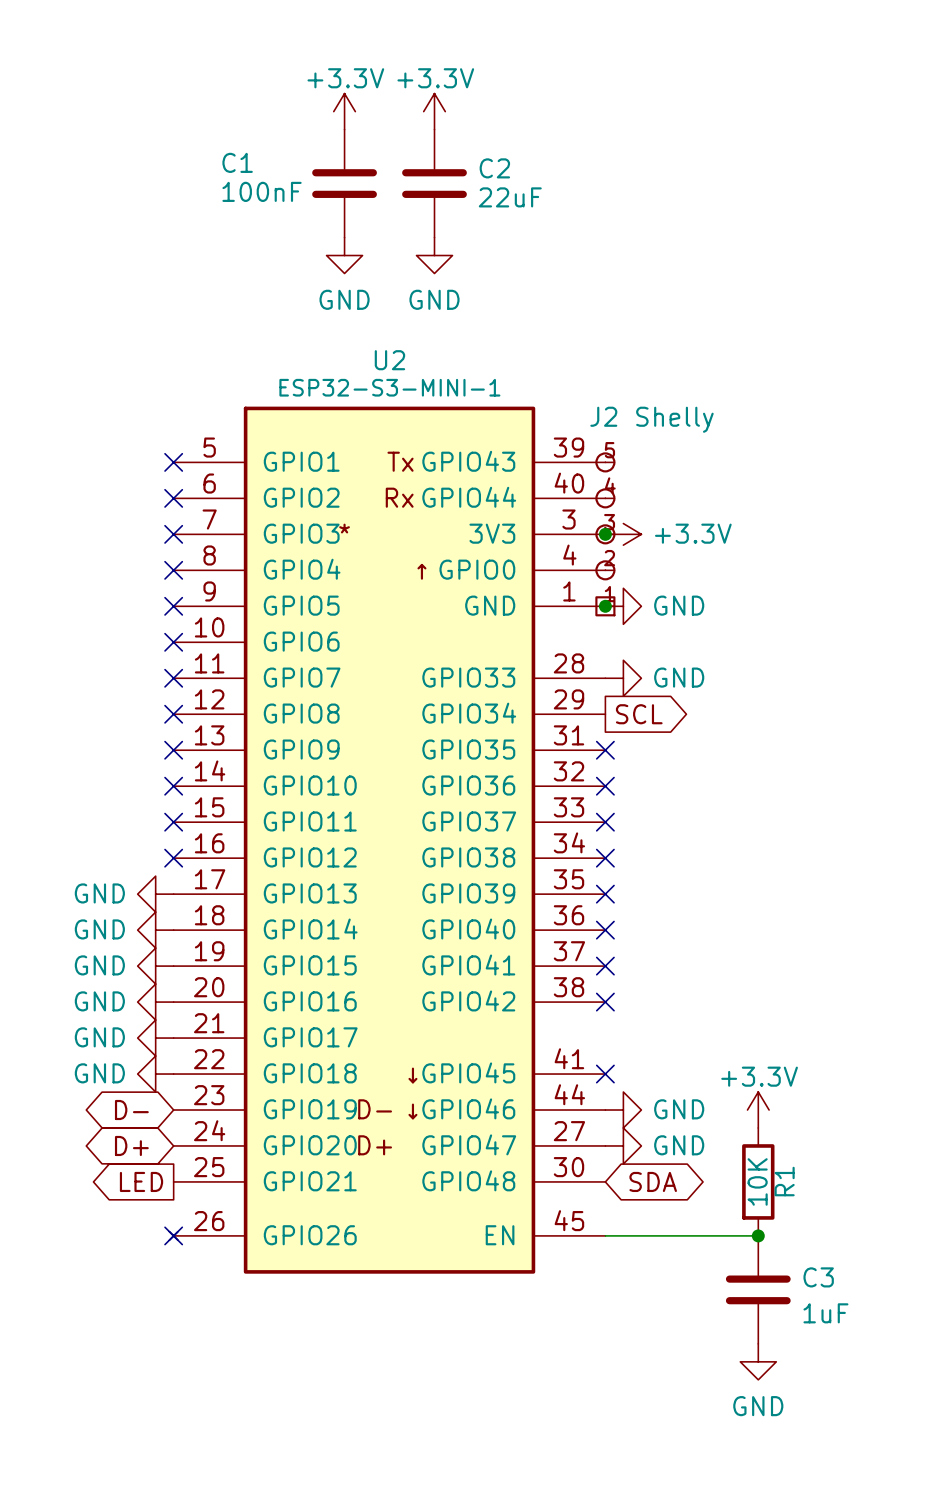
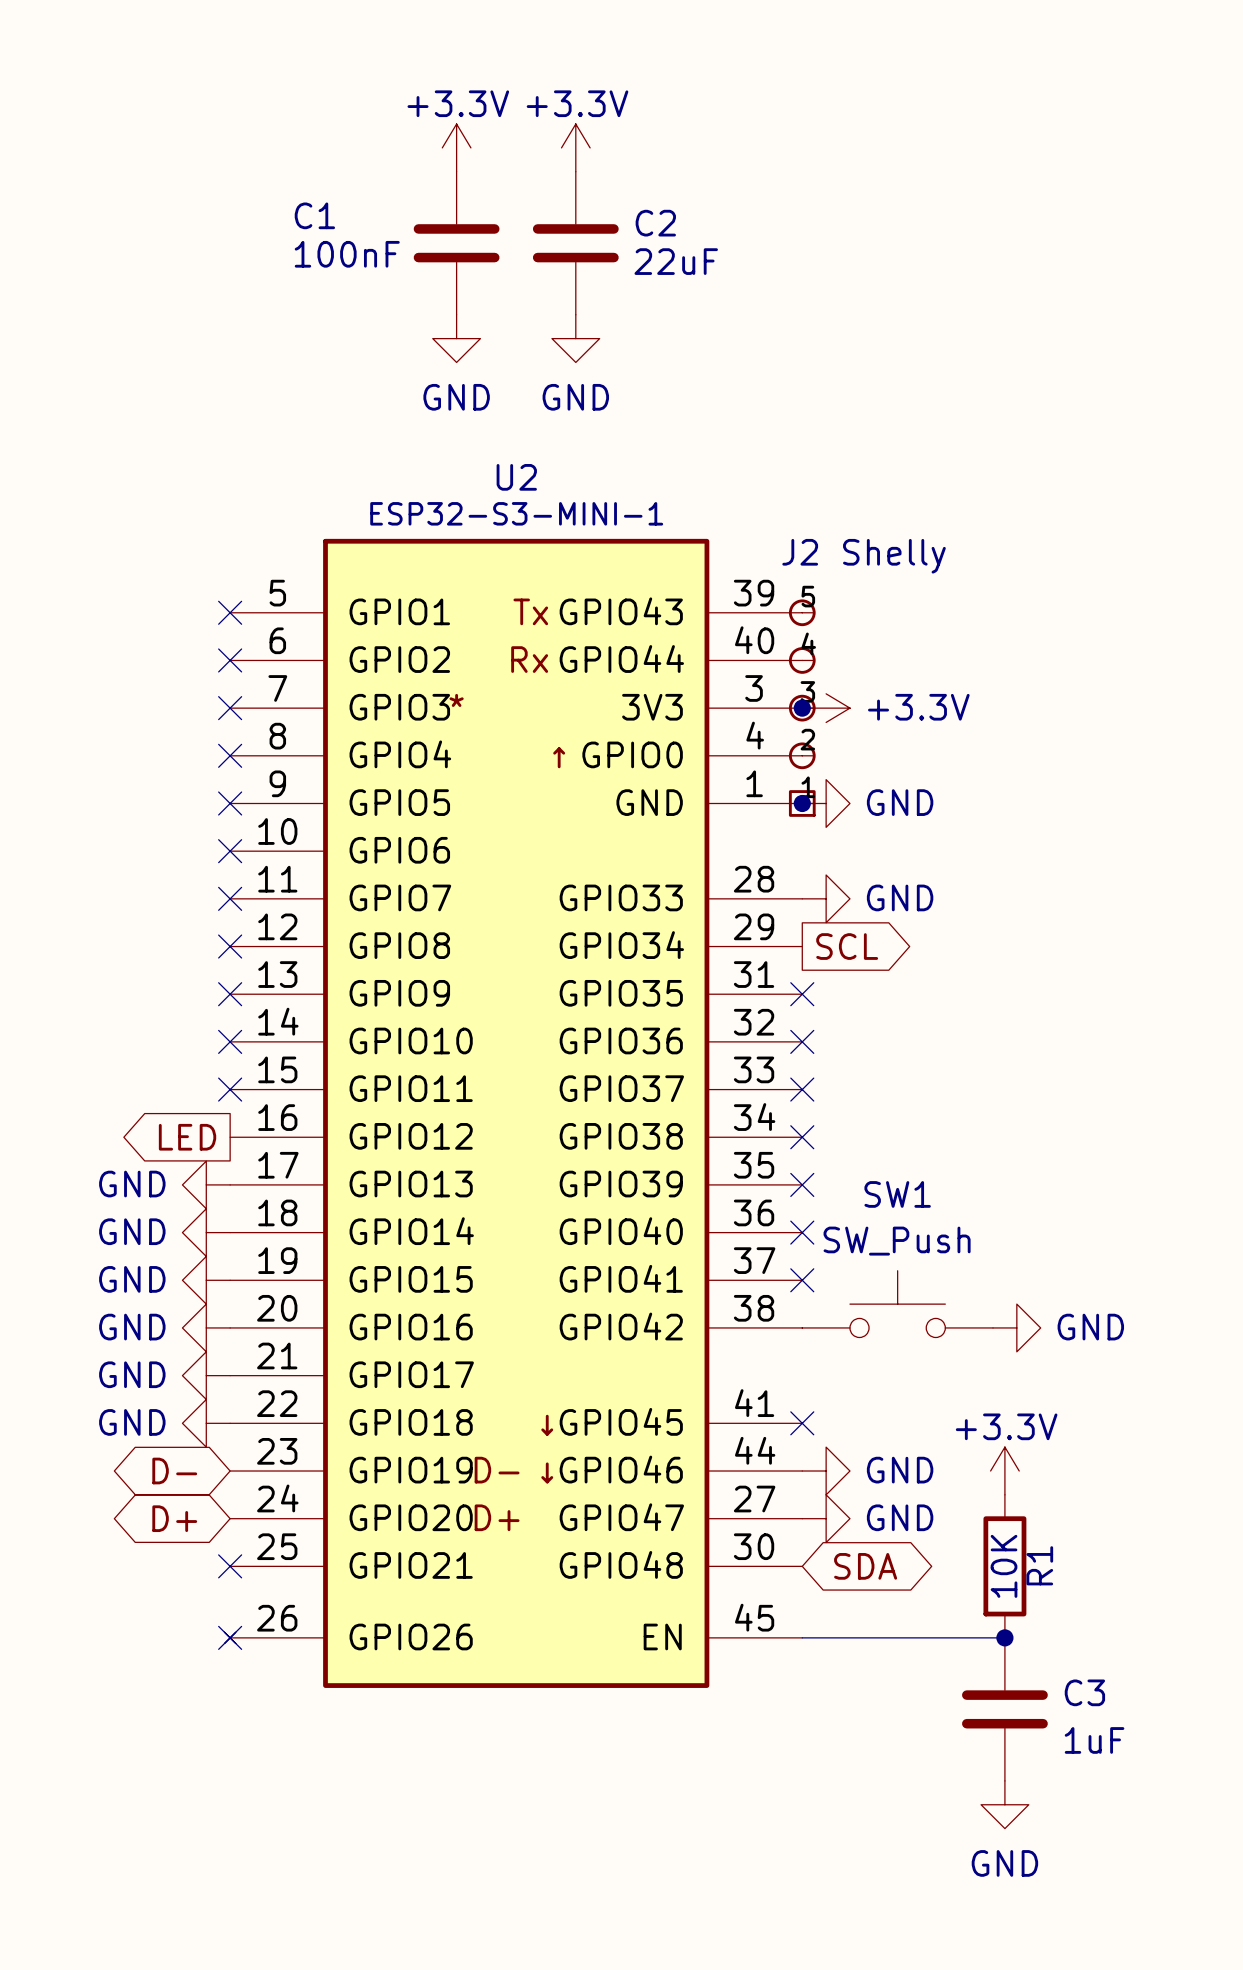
no-connect mark: (173, 858) -> none
SW1: none -> SW_Push (897, 1304)
no-connect mark: (605, 1002) -> none
power symbol: none -> GND (1016, 1327)
global label position: LED (141, 1181) -> LED (187, 1137)
no-connect mark: none -> (230, 1566)

